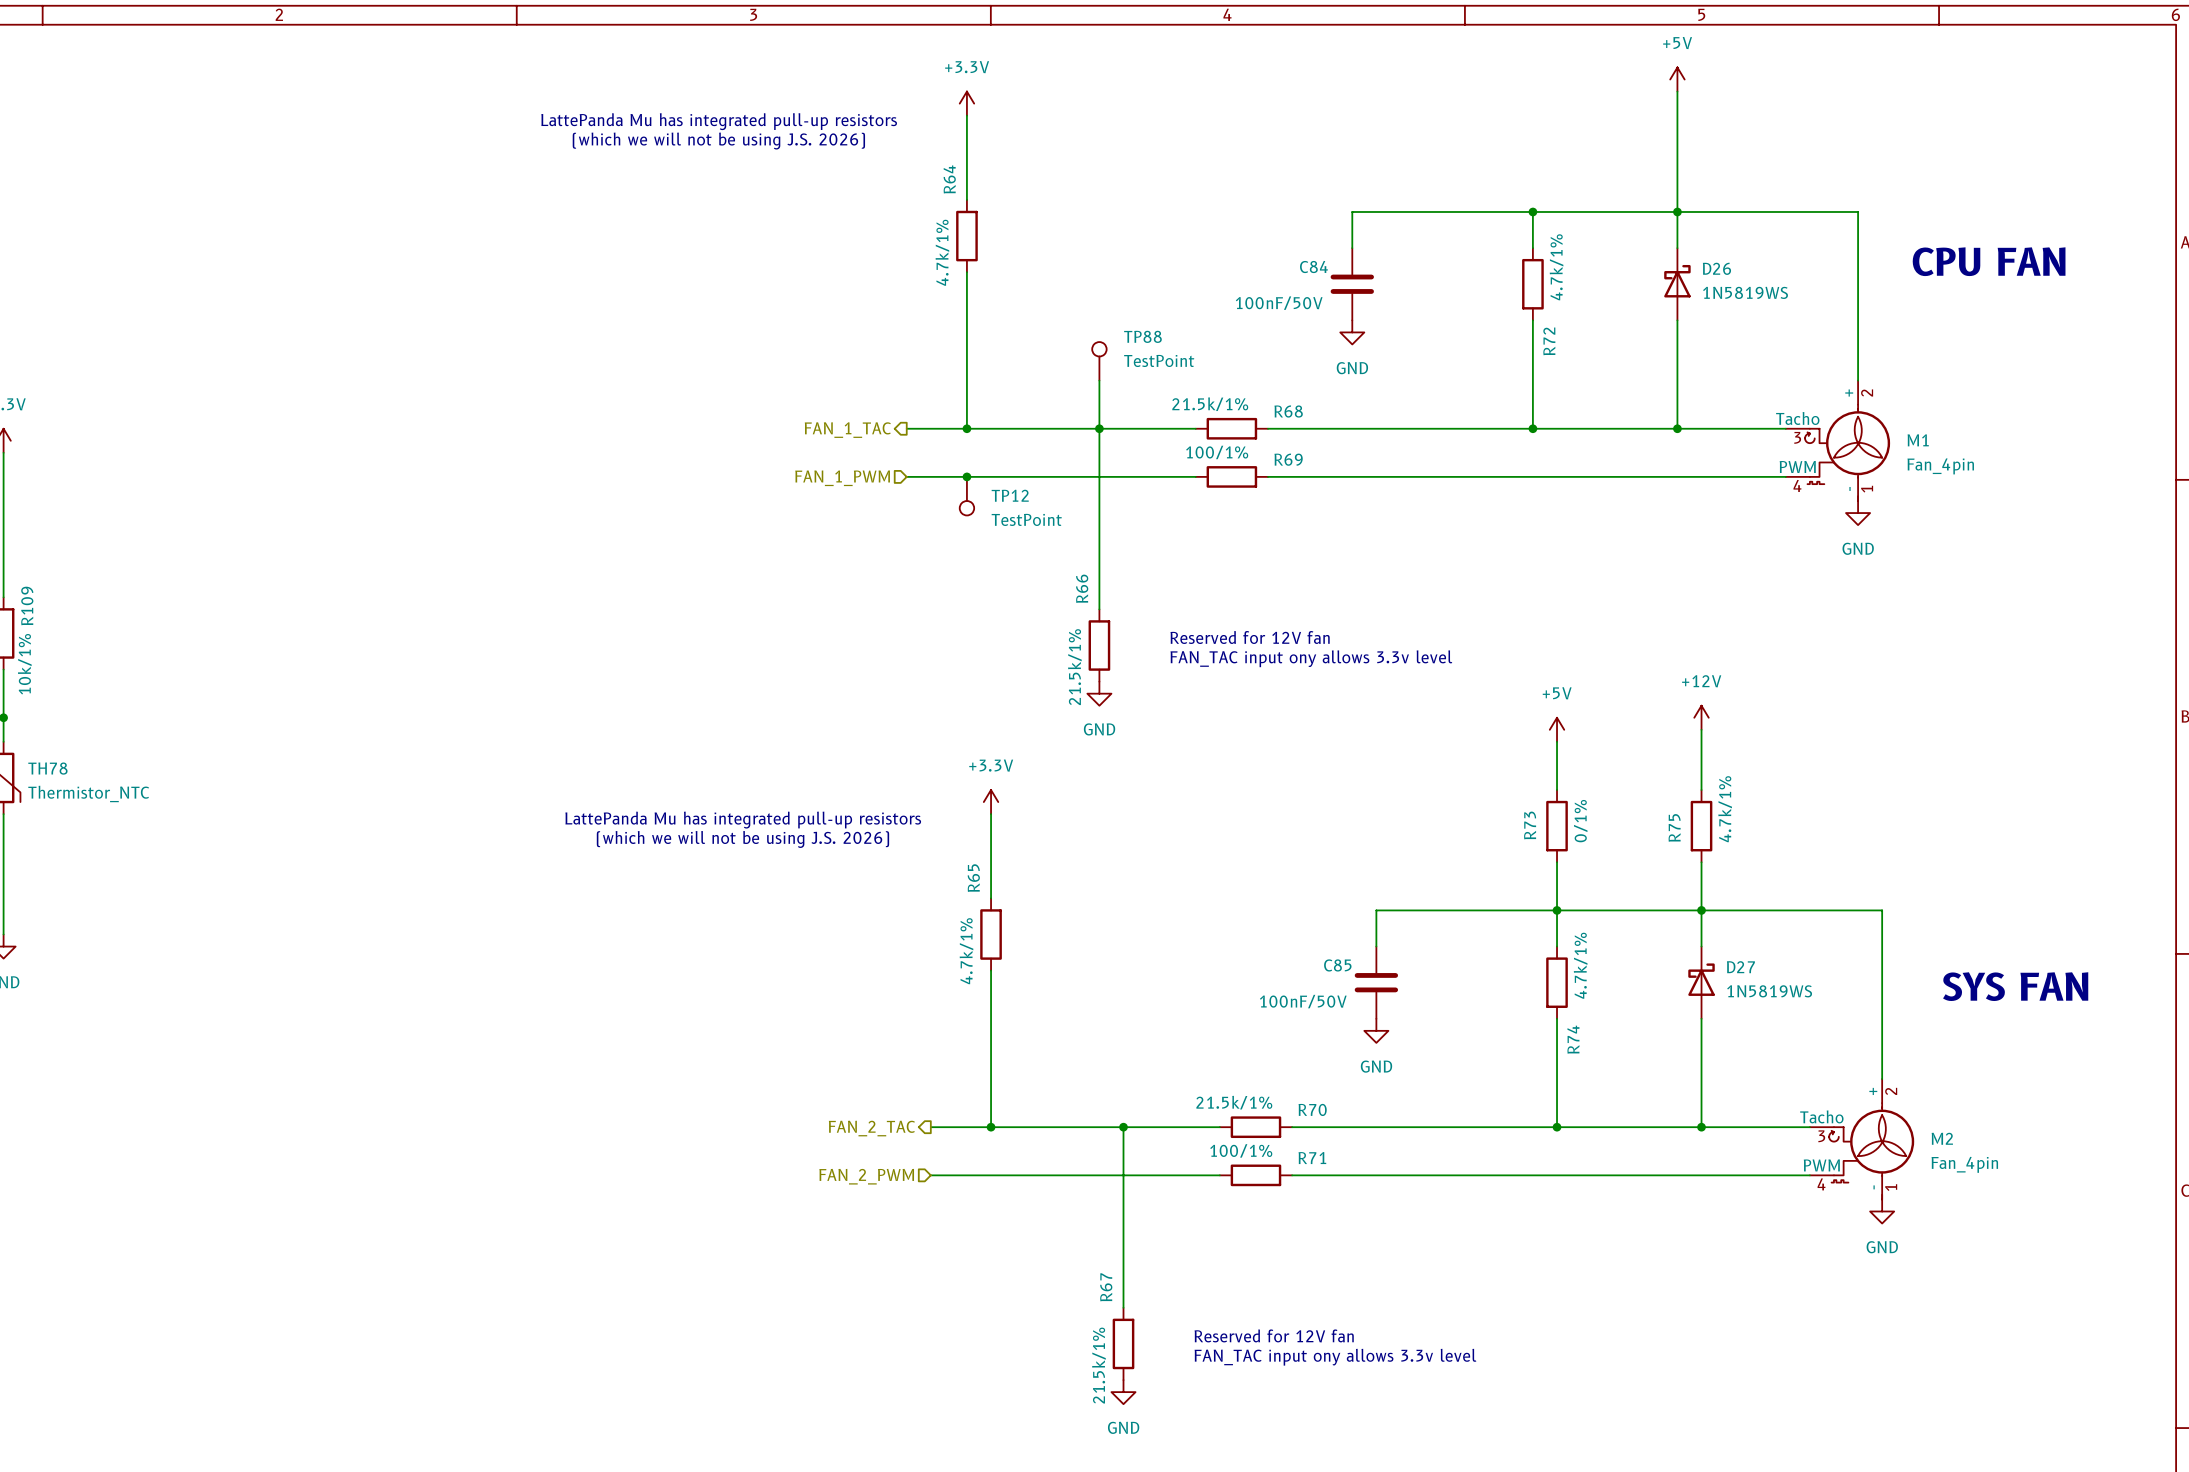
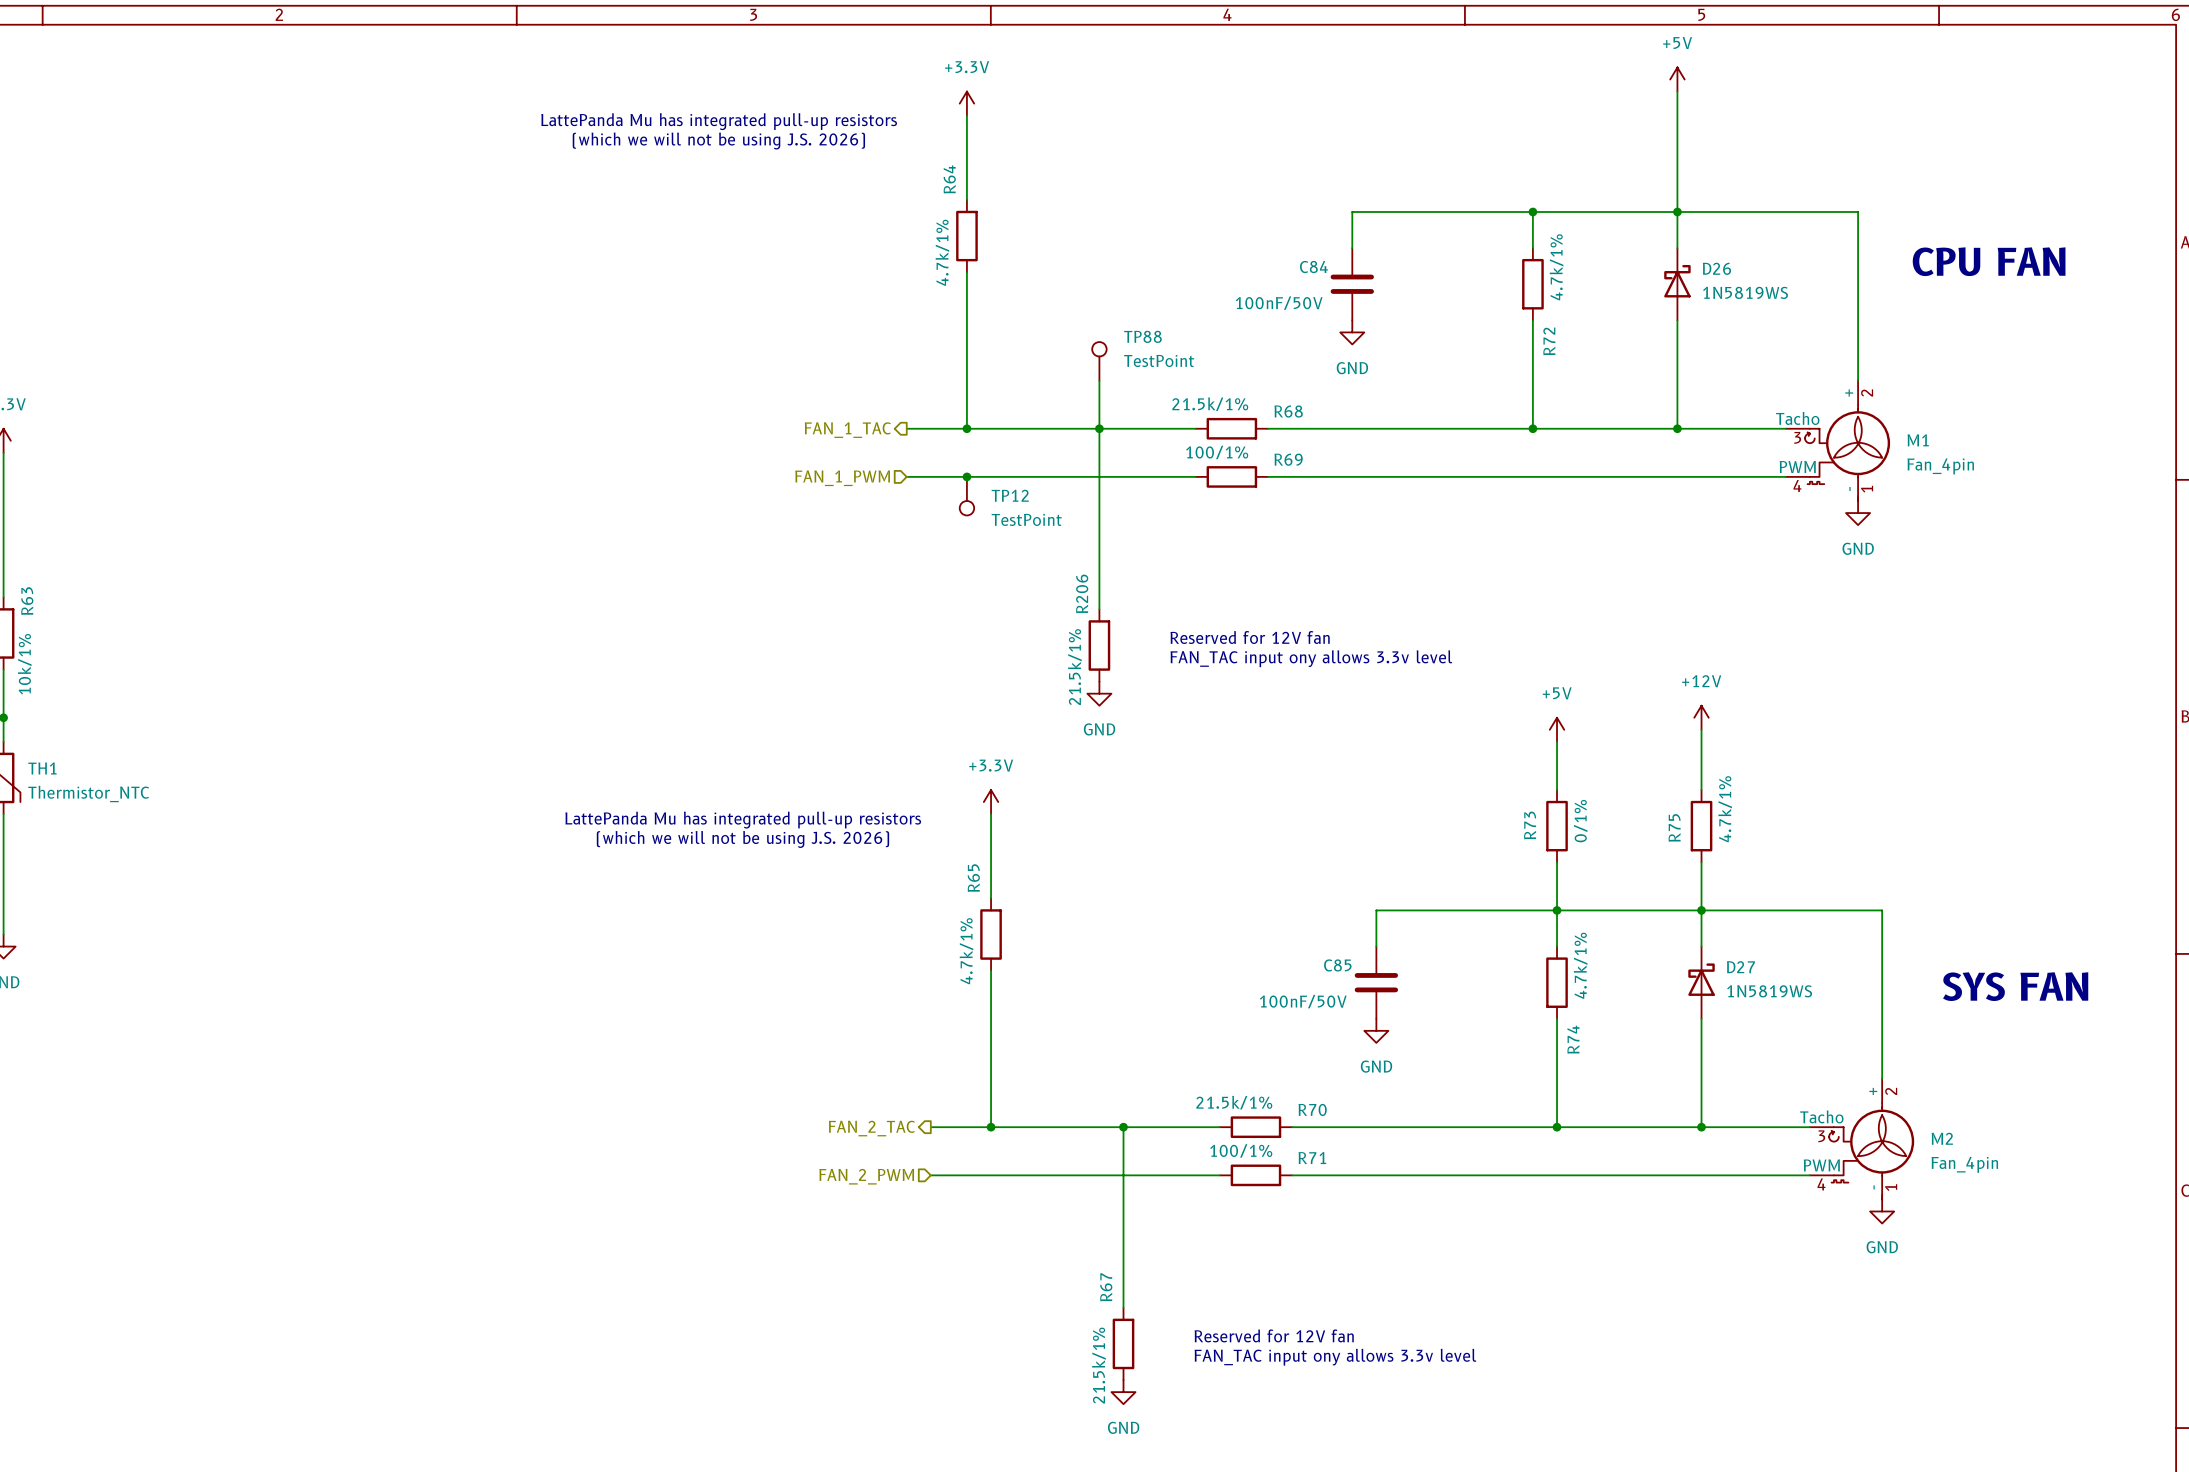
R66 name: R66 (1082, 588) -> R206 (1082, 593)
R109 name: R109 (27, 605) -> R63 (27, 601)
TH78 name: TH78 (47, 768) -> TH1 (42, 768)

